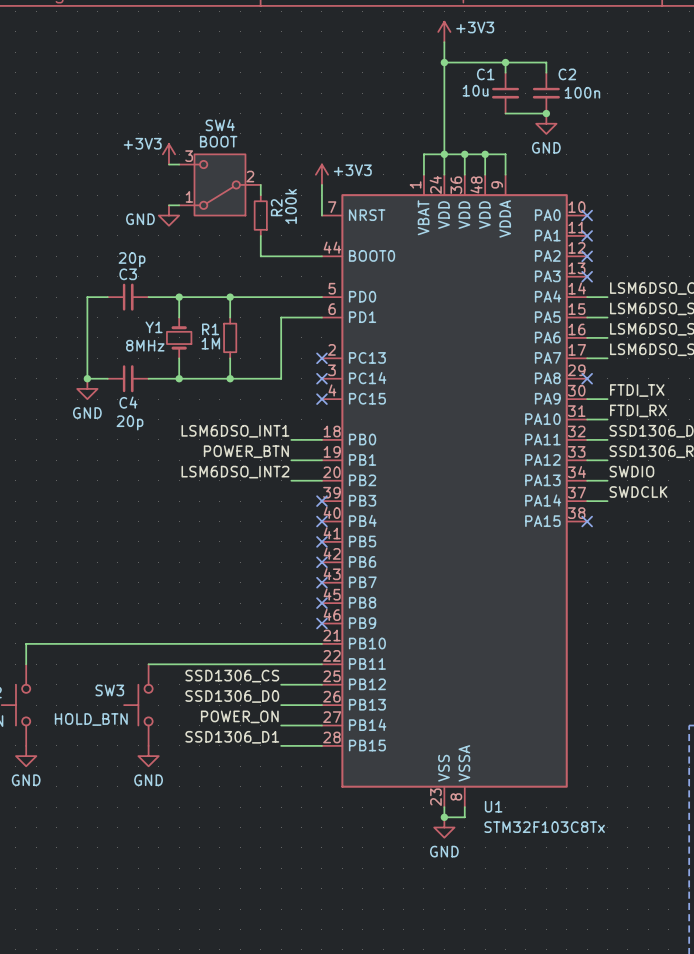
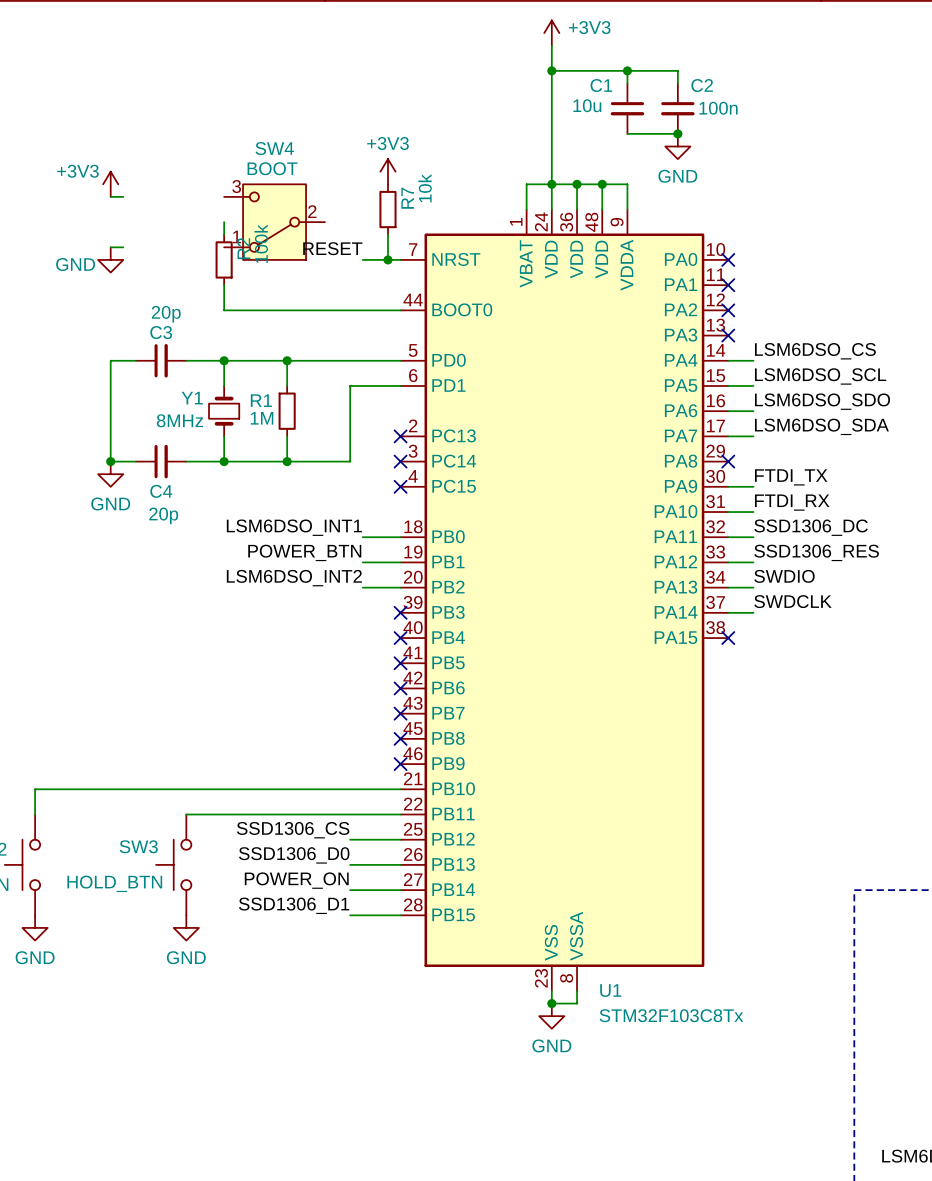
power symbol: none -> +3V3 (110, 184)
power symbol: +3V3 (168, 154) -> none
wire: (168, 164) (179, 164) -> (110, 196) (123, 196)
power symbol text position: +3V3 (352, 170) -> +3V3 (388, 143)
R7: none -> 10k (387, 209)
power symbol position: +3V3 (321, 174) -> +3V3 (387, 171)
wire: (260, 184) (260, 195) -> (224, 222) (224, 234)
wire: (321, 184) (321, 215) -> (362, 259) (400, 259)
wire: none -> (387, 234) (387, 259)
wire: (168, 205) (179, 205) -> (110, 247) (123, 247)
label: none -> RESET (332, 248)
power symbol position: GND (168, 215) -> GND (110, 259)
R2 position: (260, 215) -> (224, 259)
junction: none -> (387, 259)
wire: (260, 235) (260, 256) -> (224, 285) (224, 310) (324, 310)

